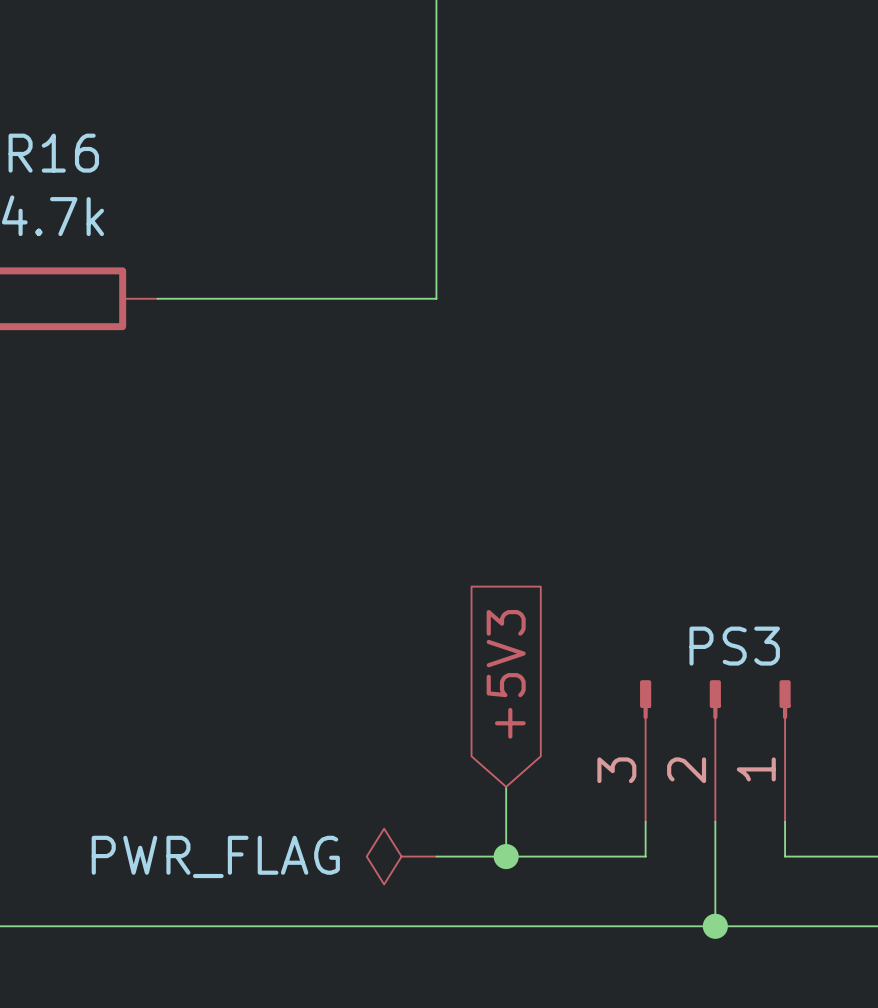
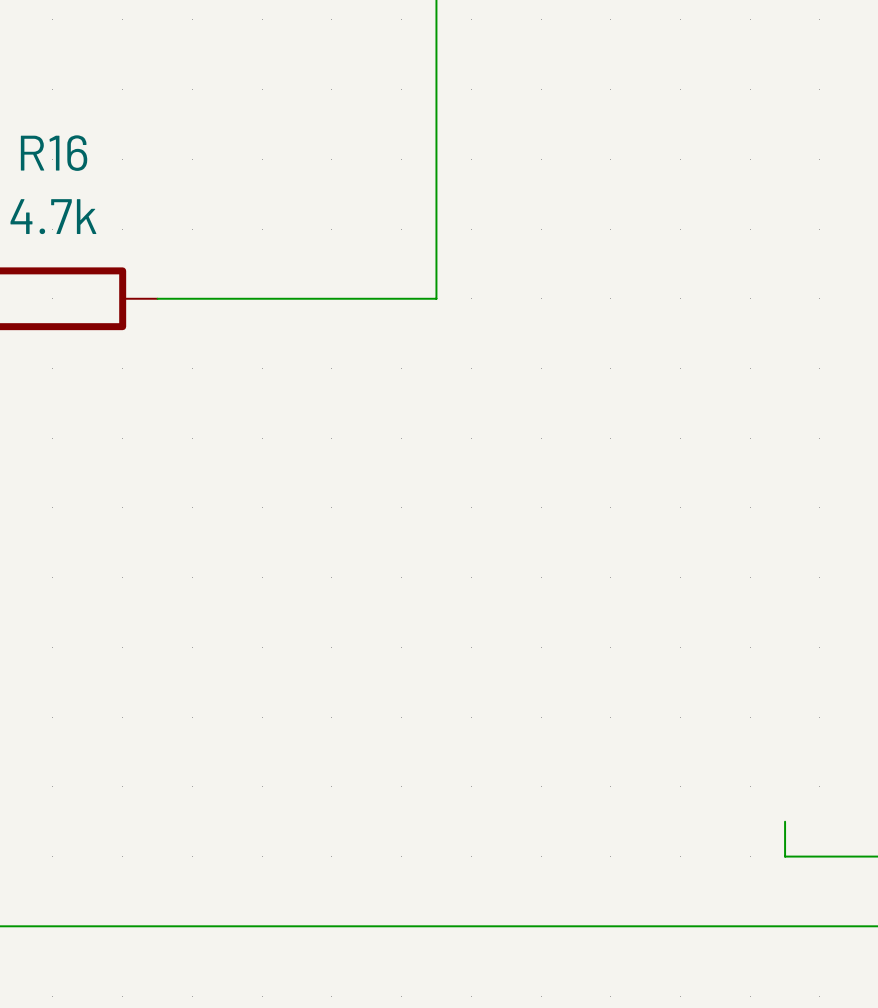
global label: +5V3 (506, 674) -> none
PS3: (715, 750) -> none
wire: (506, 786) (506, 856) -> none
wire: (645, 821) (645, 856) (436, 856) -> none
wire: (715, 821) (715, 926) -> none
power symbol: PWR_FLAG (401, 856) -> none
junction: (506, 856) -> none
junction: (715, 926) -> none

